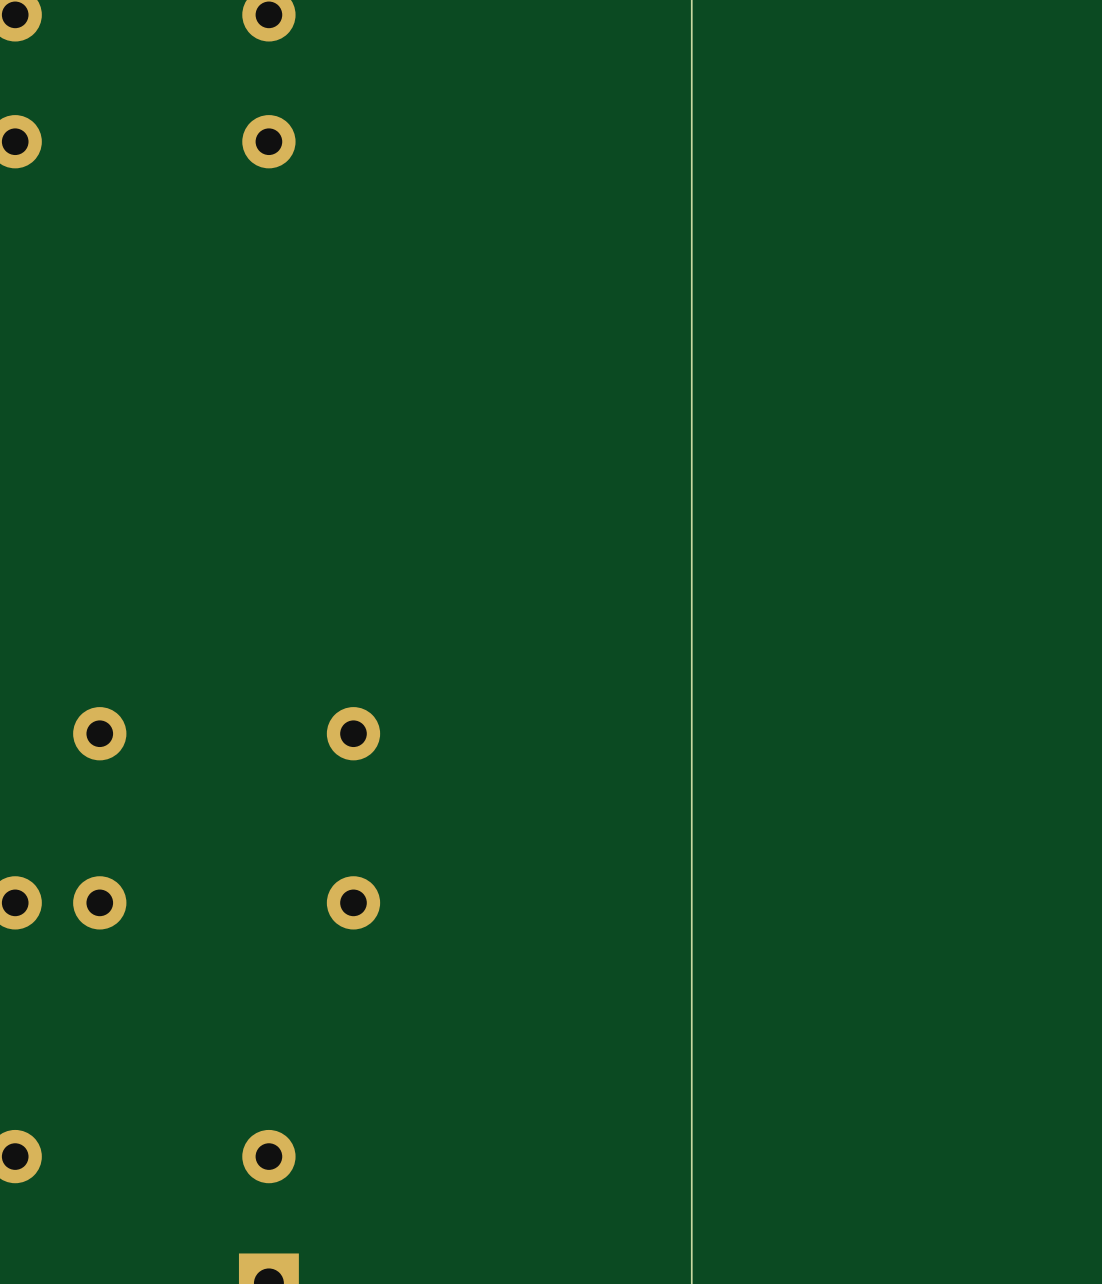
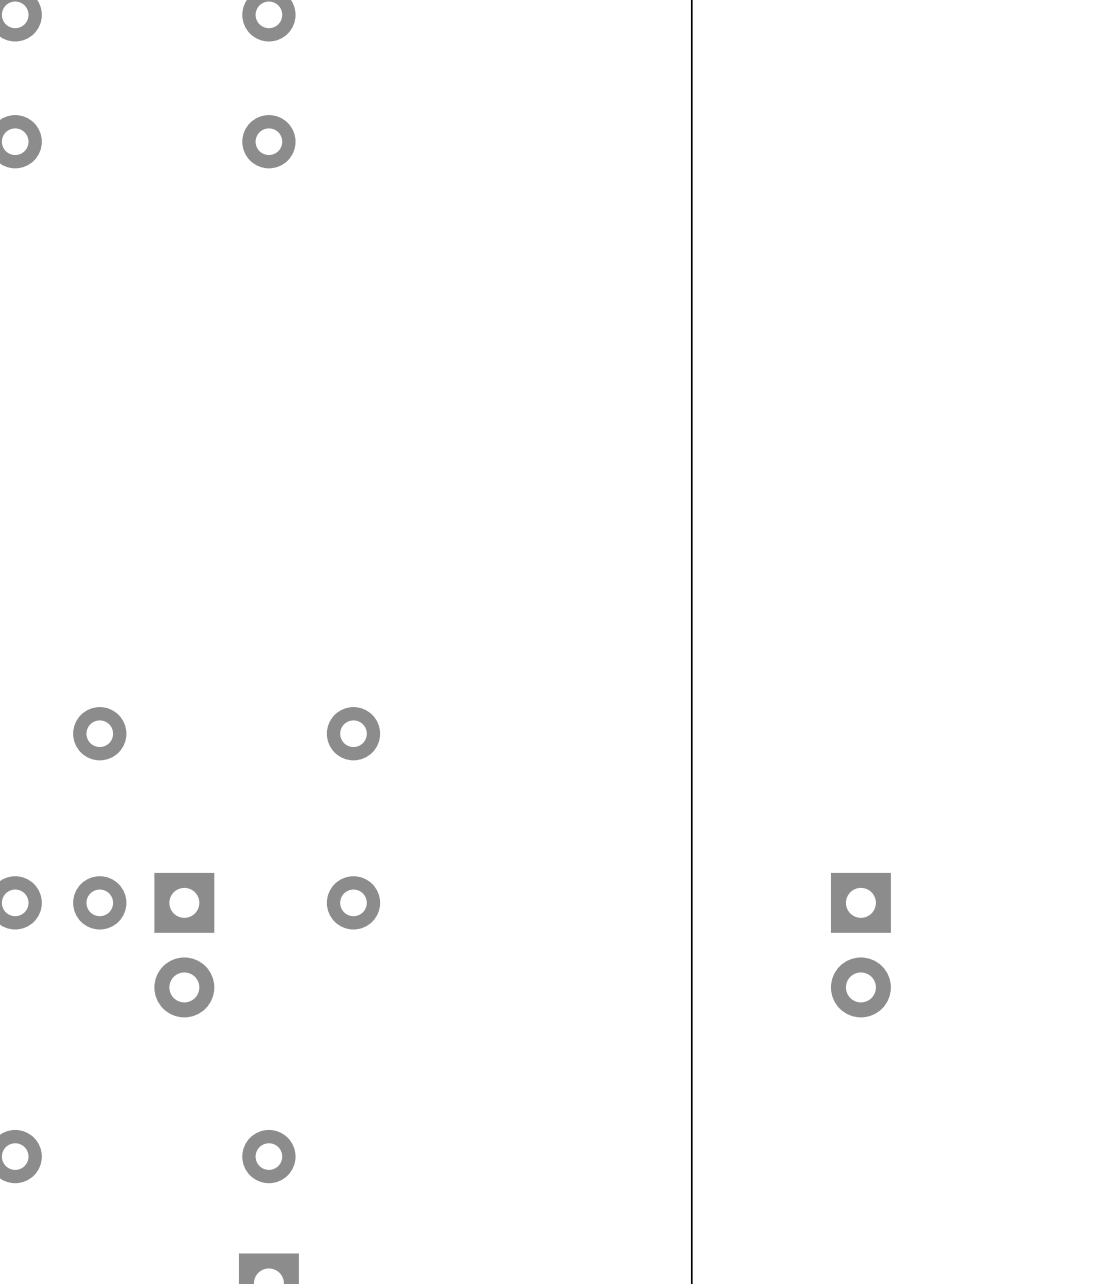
part: none -> (184, 945)
part: none -> (860, 945)

